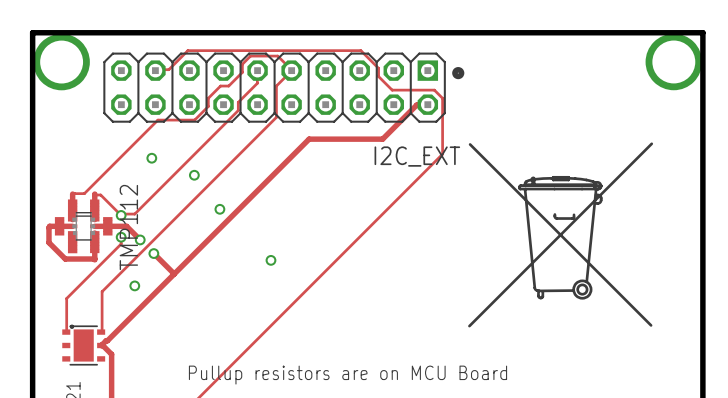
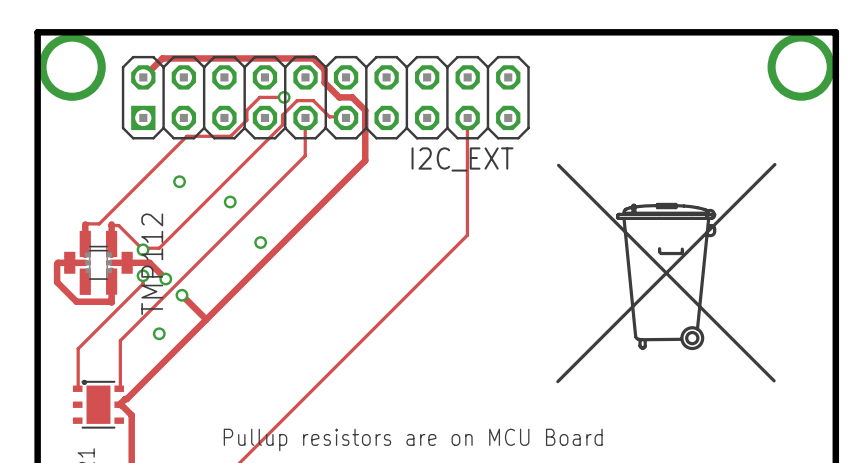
drawing: [452, 67, 465, 80] -> none
track: (155, 70) (168, 69) (187, 50) (360, 50) (378, 68) (378, 76) (392, 90) (434, 90) (442, 98) (442, 154) (393, 203) -> (467, 117) (467, 235)
track: (257, 70) (257, 83) (250, 90) -> (346, 117) (329, 116) (313, 100) (297, 100)
track: (219, 87) (228, 86) (242, 72) (242, 64) (250, 56) (277, 56) (291, 69) (276, 86) (276, 117) (257, 136) -> (305, 117) (305, 155)
track: none -> (259, 97) (284, 97)
via: none -> (284, 97)
I2C_EXT rotation: 0° (274, 87) -> 180° (325, 97)
track: (427, 104) (416, 105) (382, 139) (307, 140) -> (143, 77) (162, 58) (313, 58) (324, 69) (324, 82) (339, 97) (352, 97) (365, 110) (365, 160)
via: (270, 260) -> none

